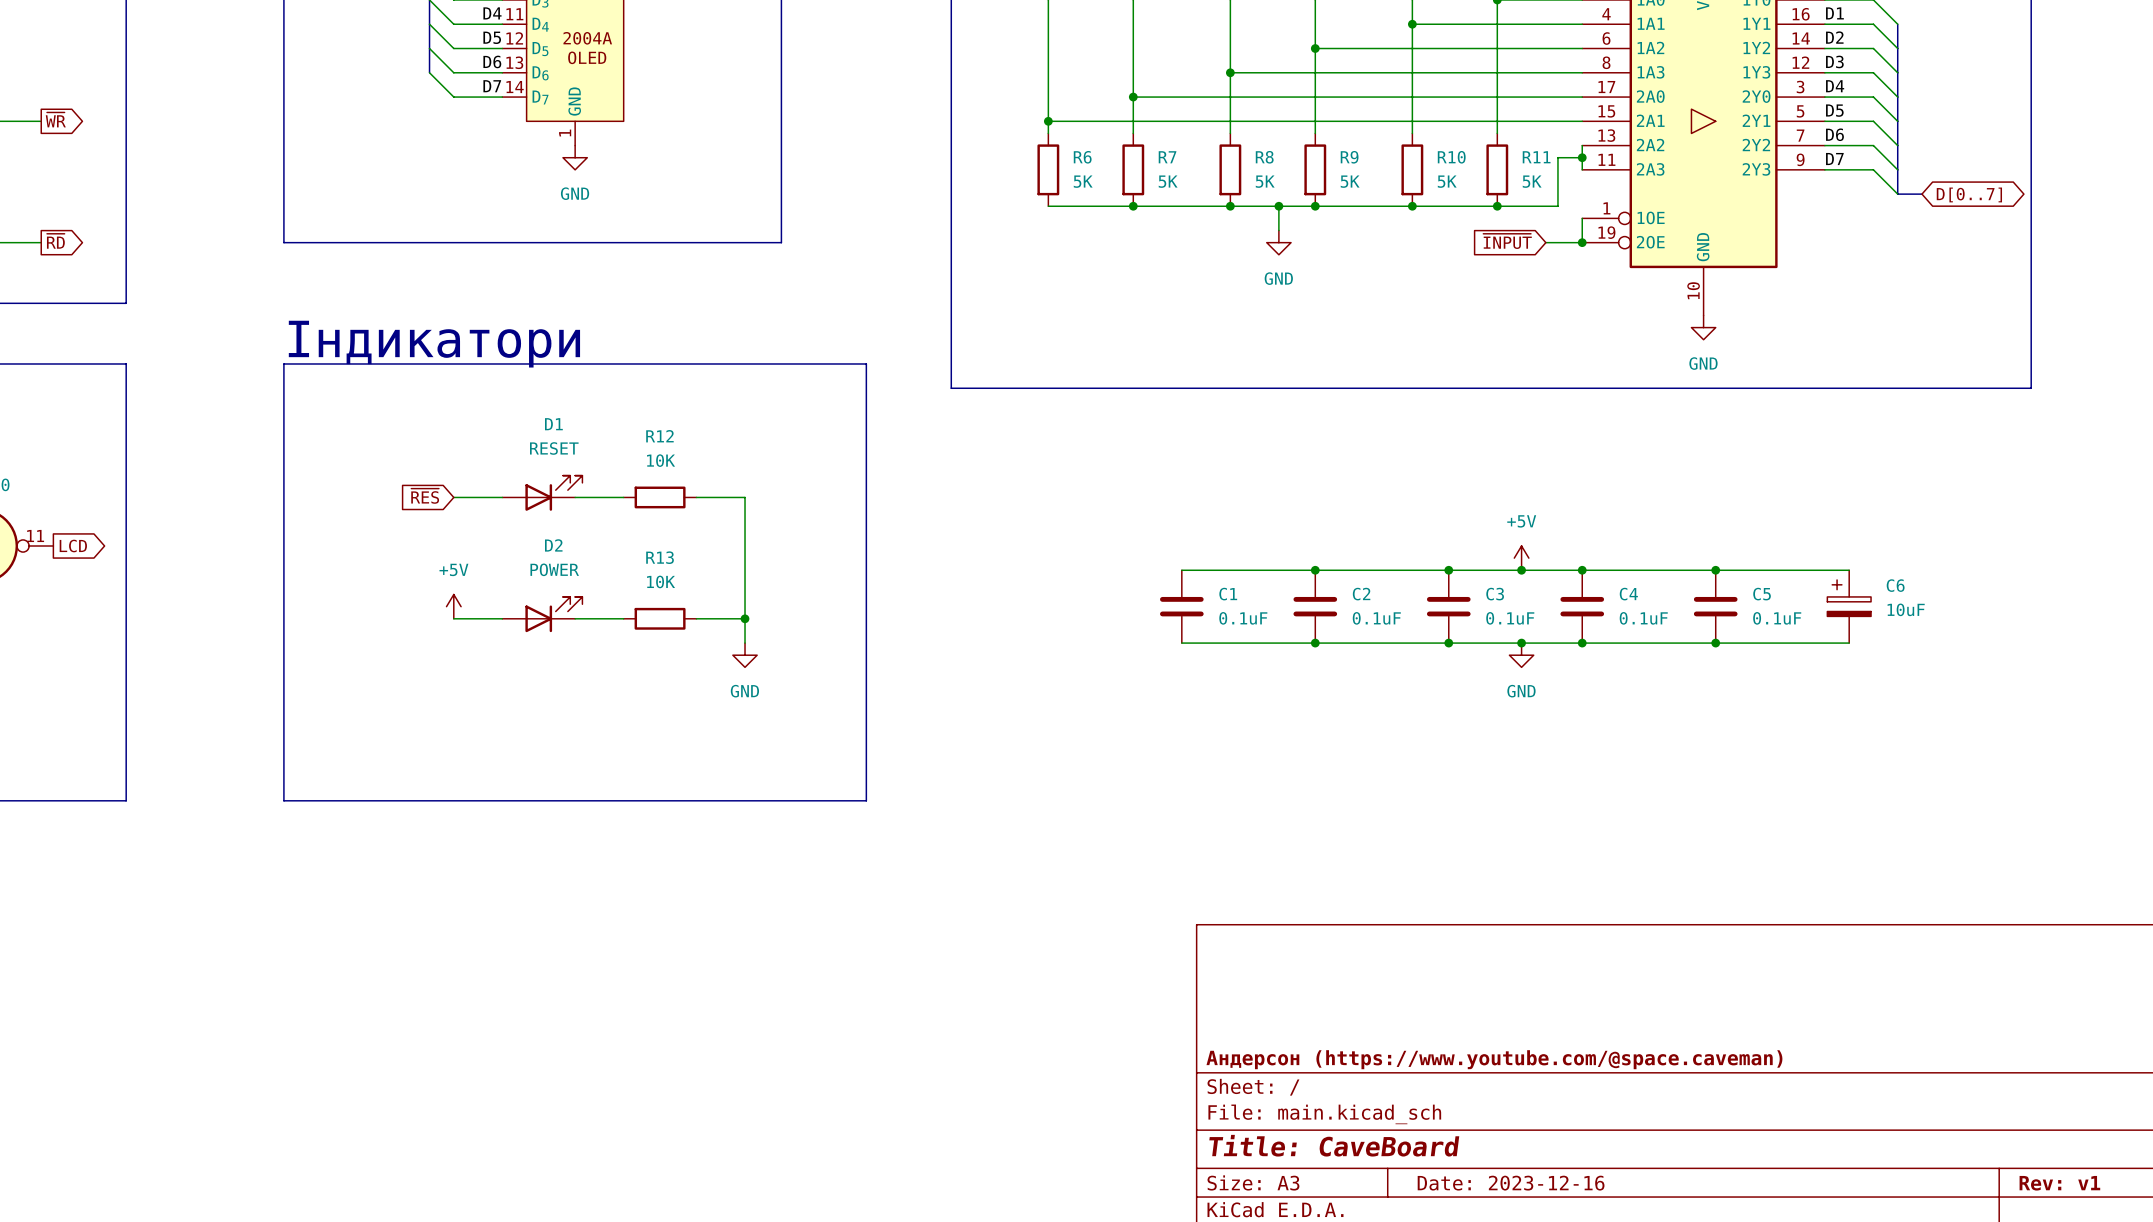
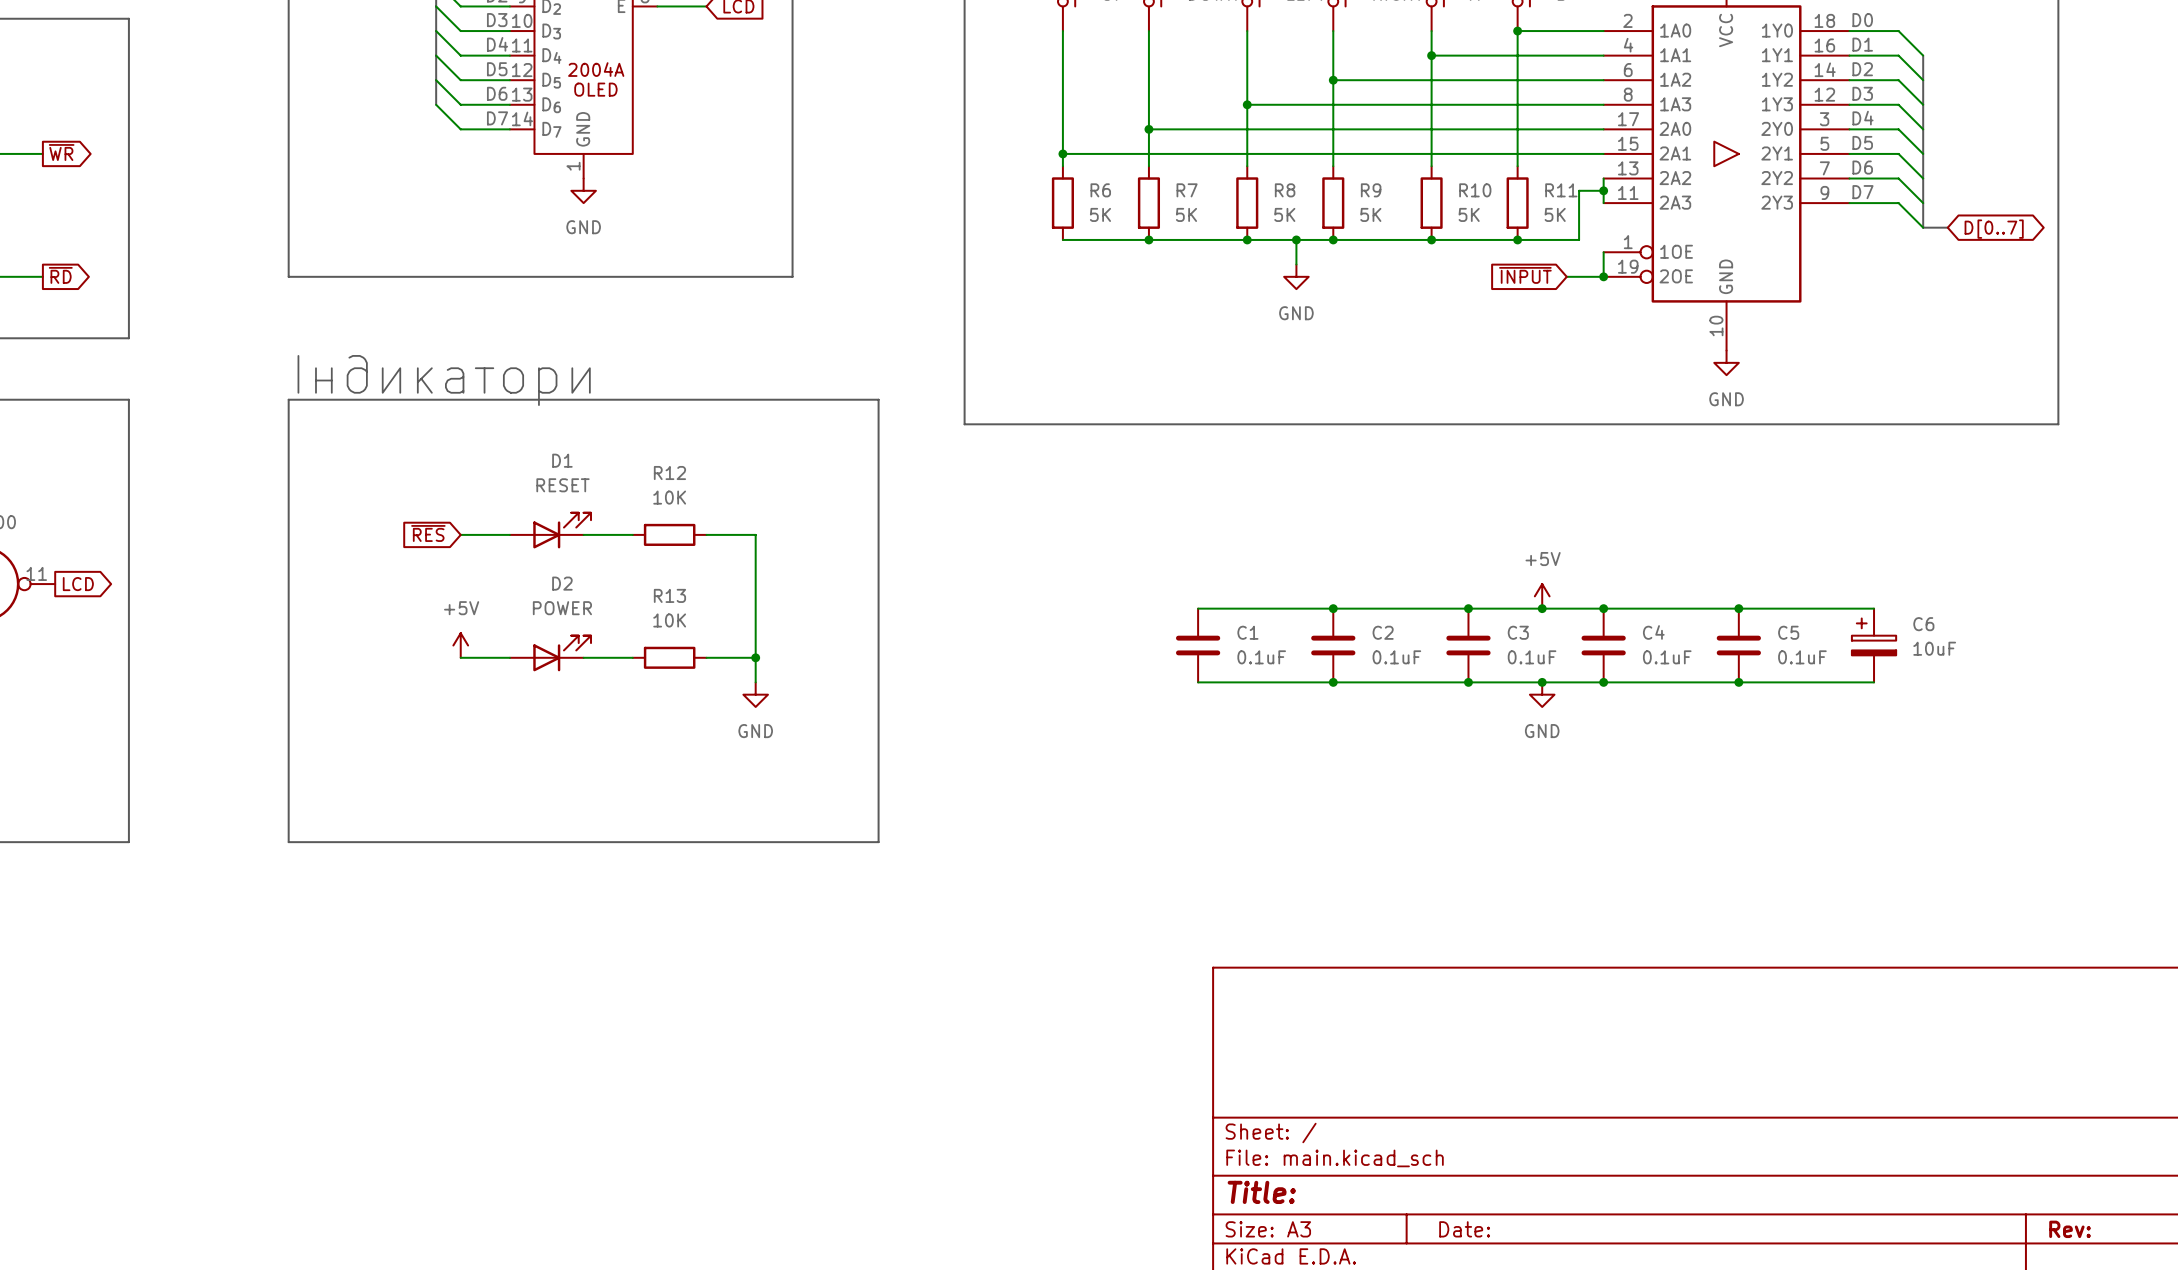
title block: Андерсон (https://www.youtube.com/@space.caveman) (1494, 1059) -> none
title block: Title: CaveBoard (1334, 1145) -> Title: (1261, 1192)
title block: Date: 2023-12-16 (1511, 1183) -> Date: (1464, 1229)
title block: Rev: v1 (2059, 1183) -> Rev: (2070, 1229)

